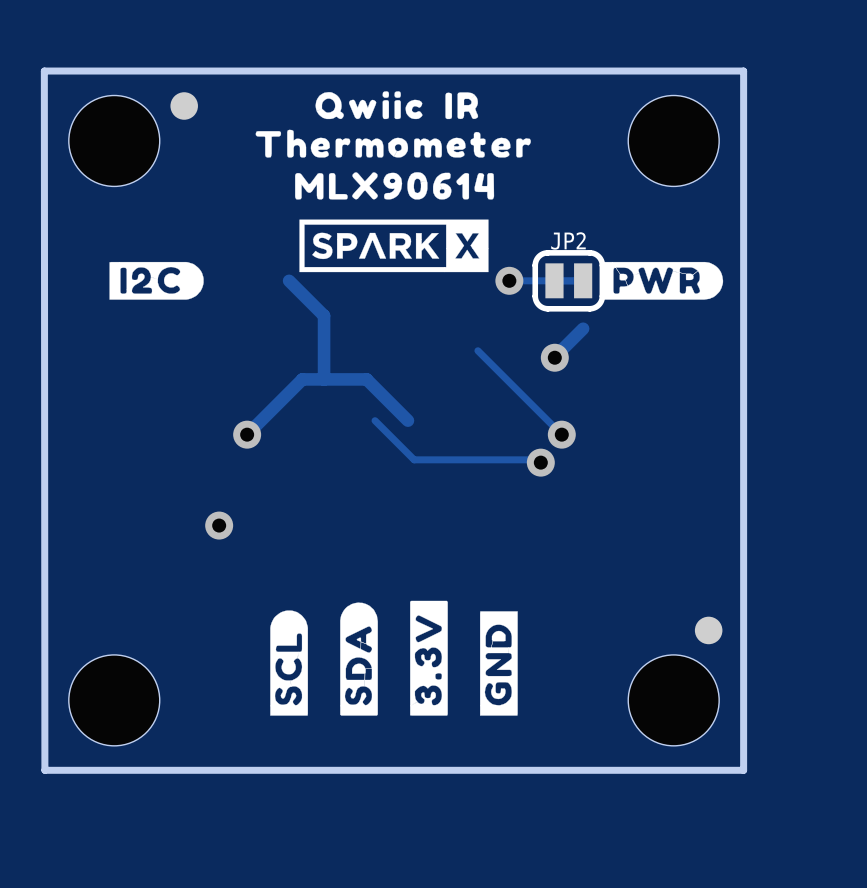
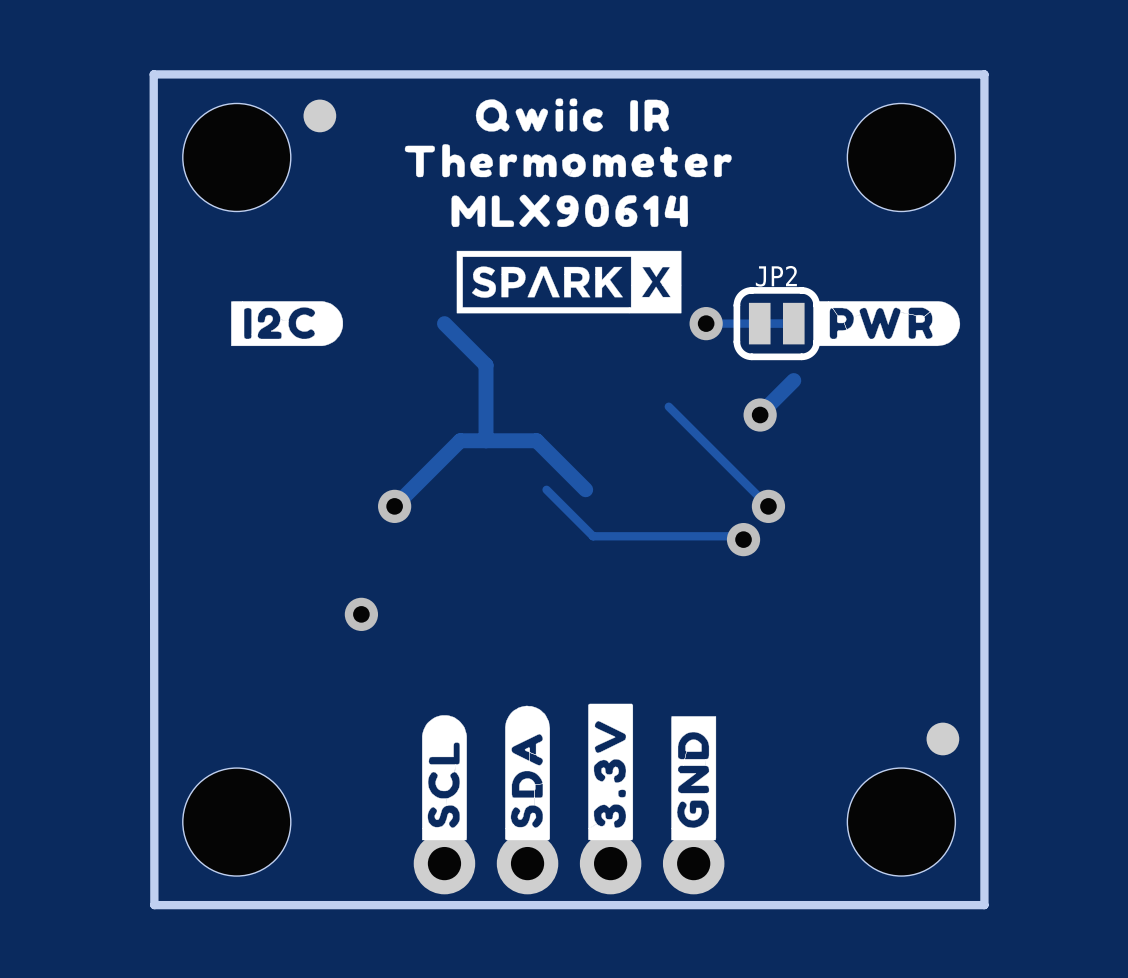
part: none -> (569, 863)

